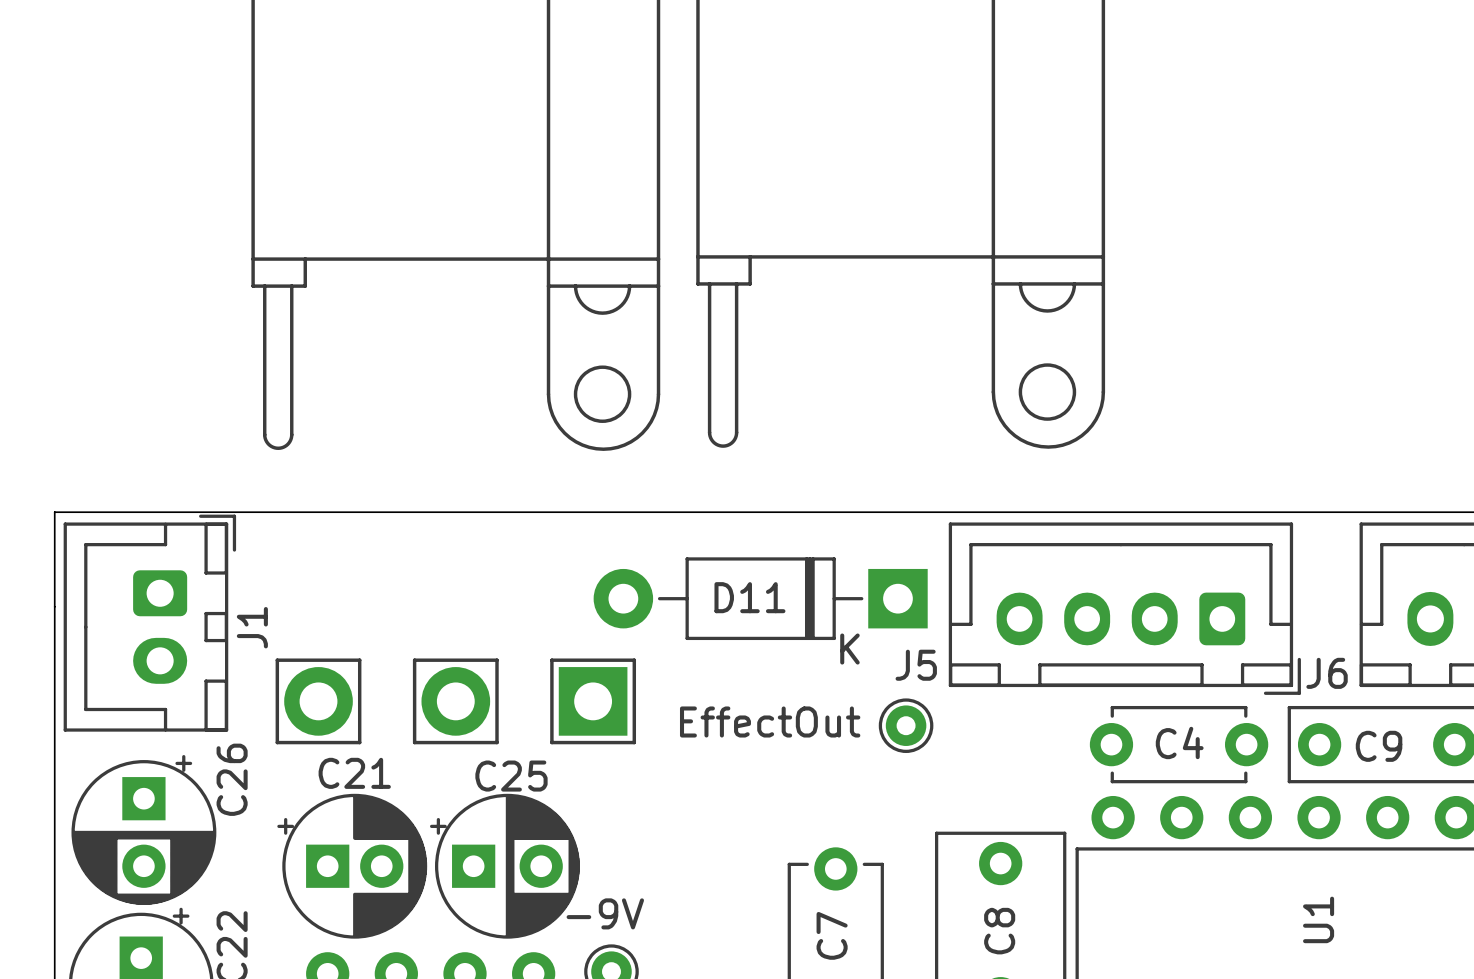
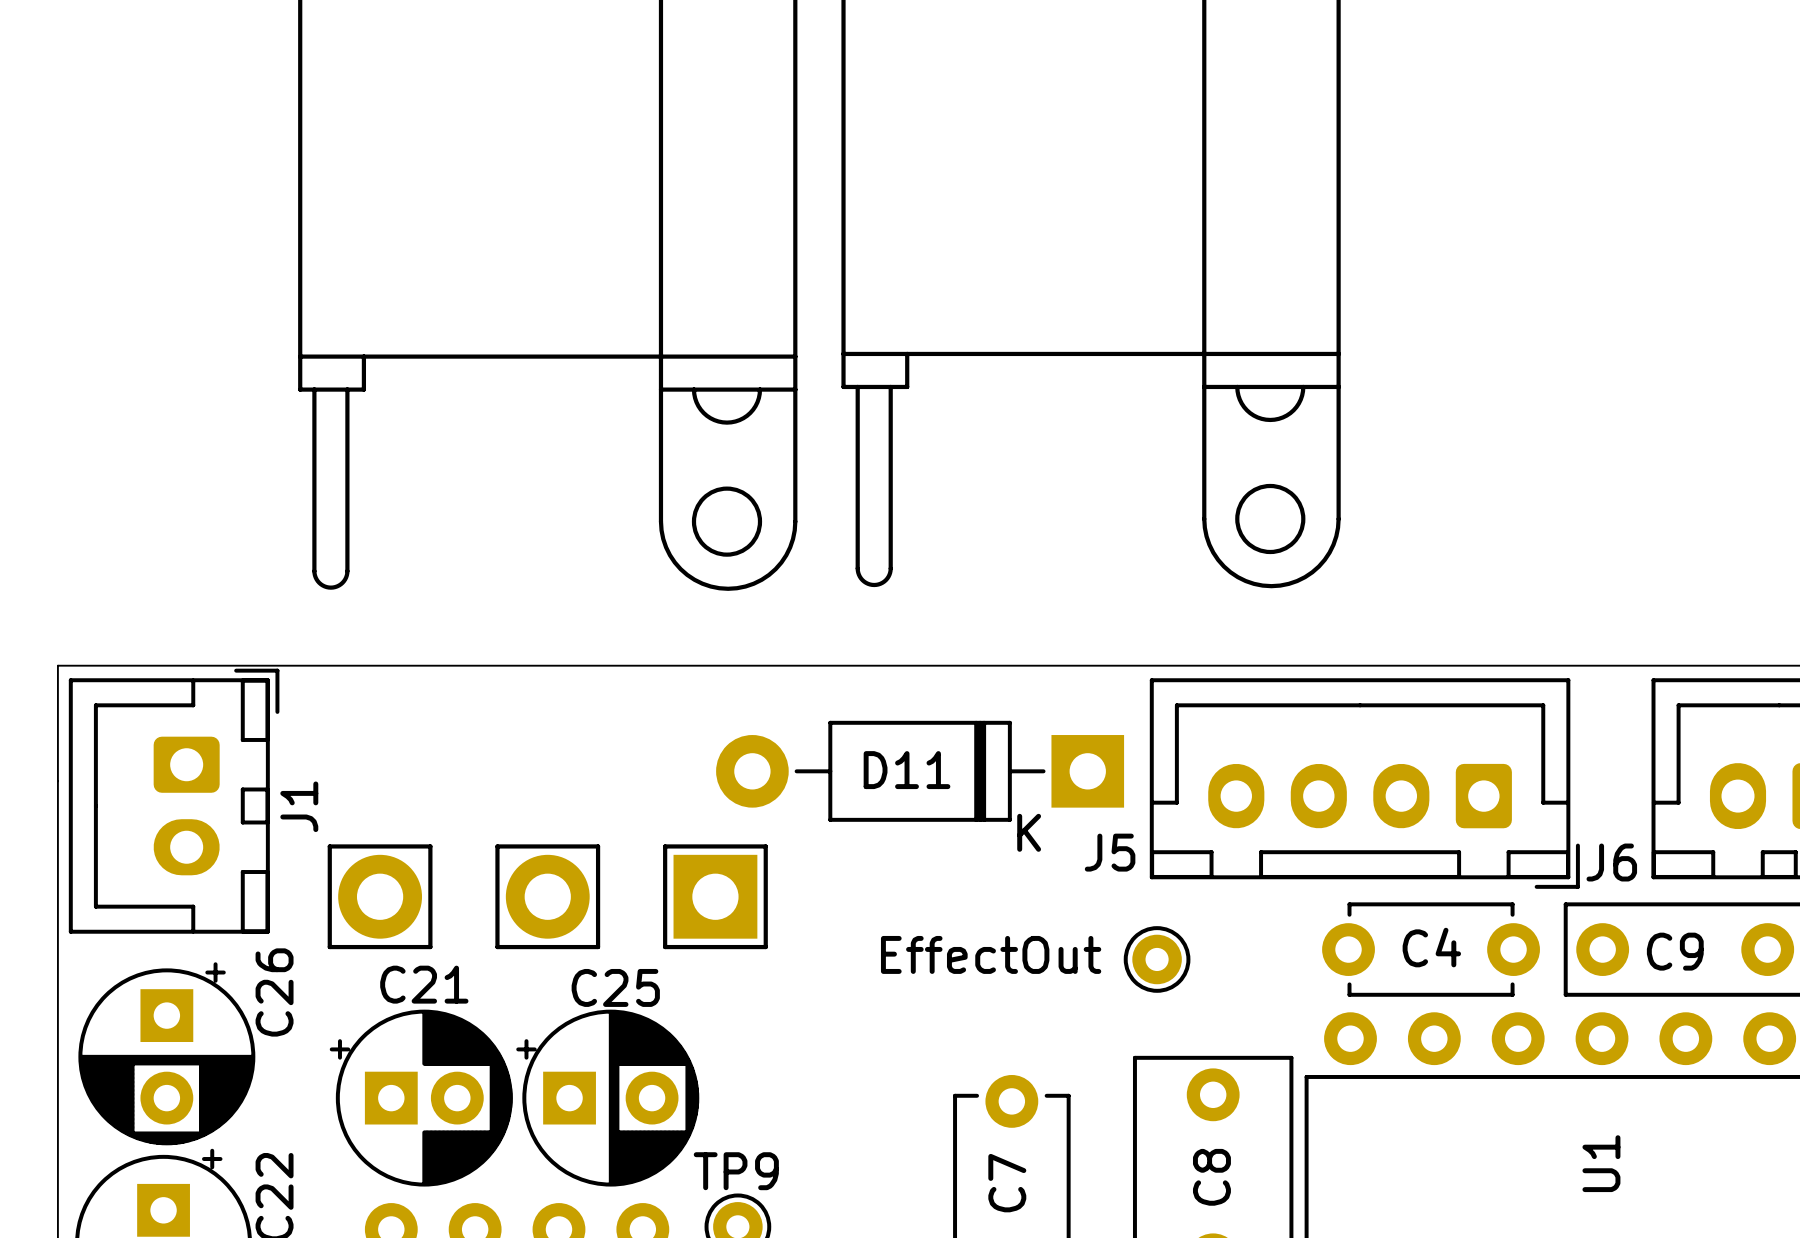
part position: (906, 725) -> (1157, 959)
TP9 value: -9V (605, 913) -> none
TP9 name: none -> TP9 (736, 1171)

